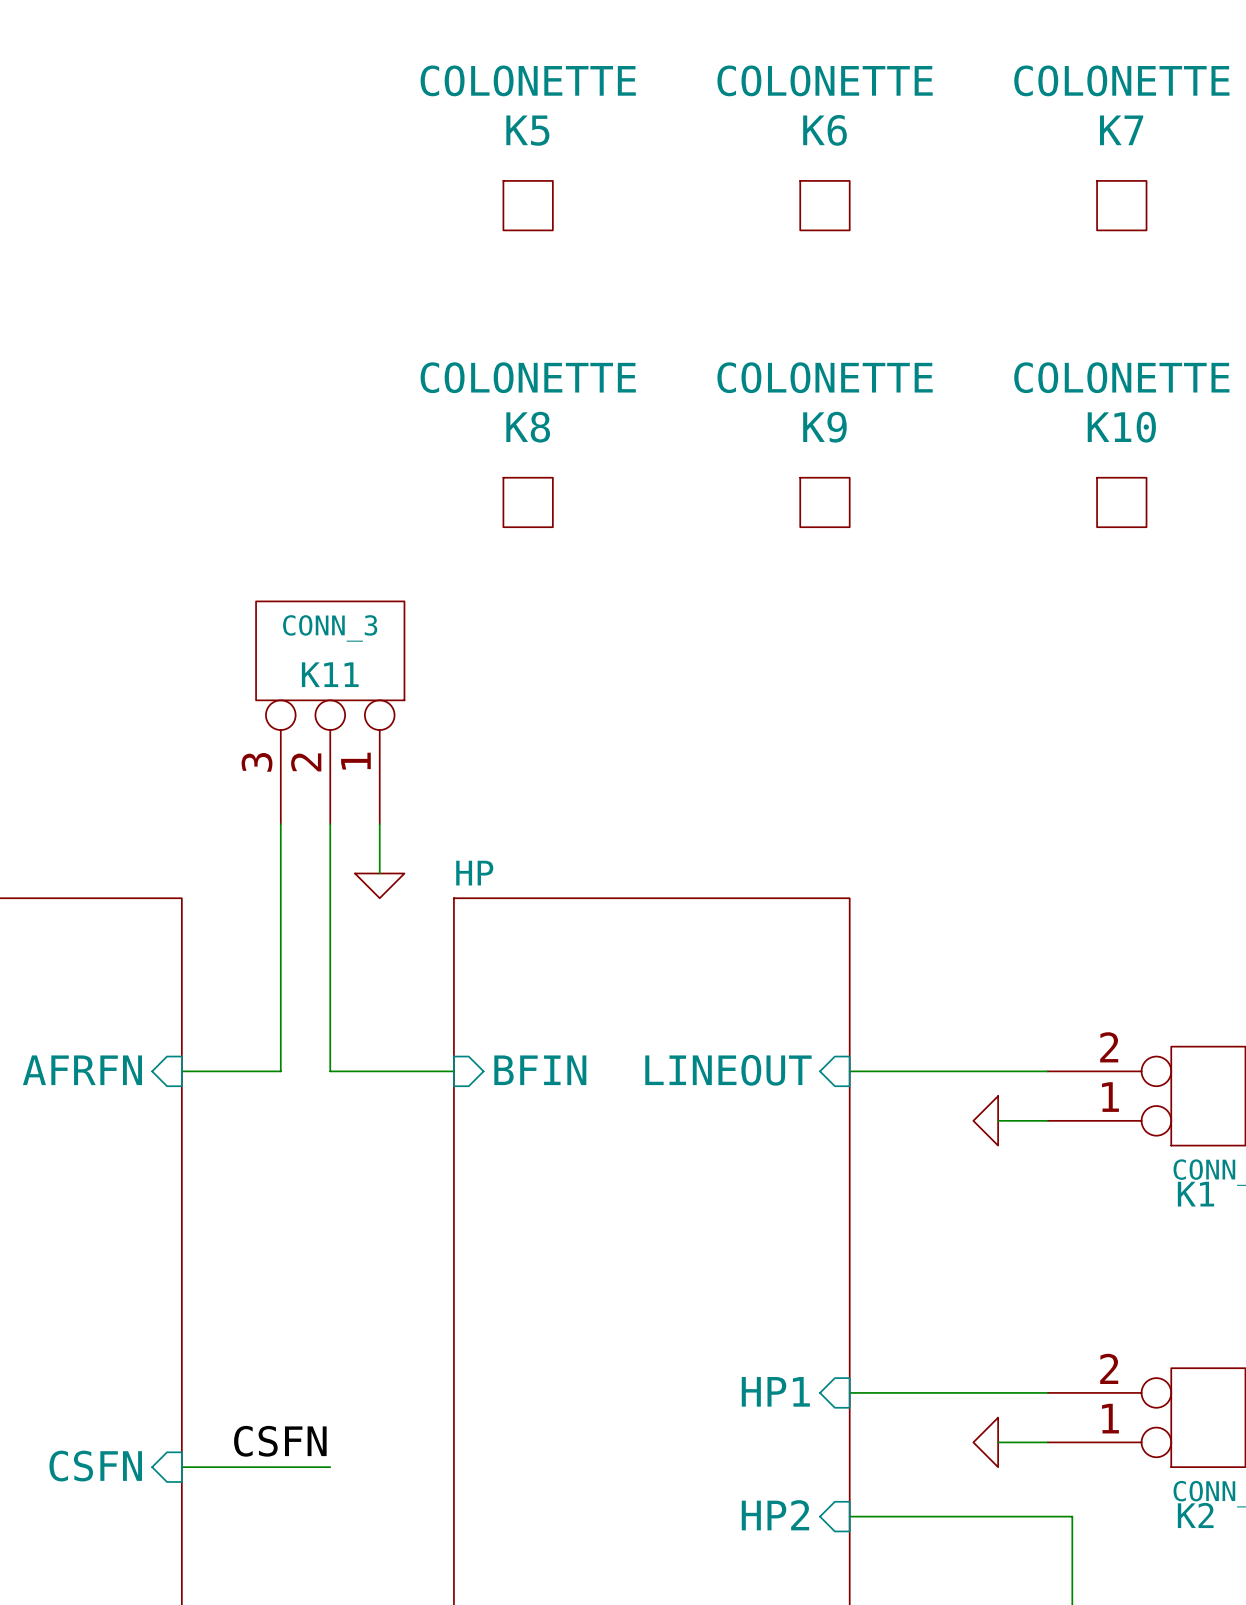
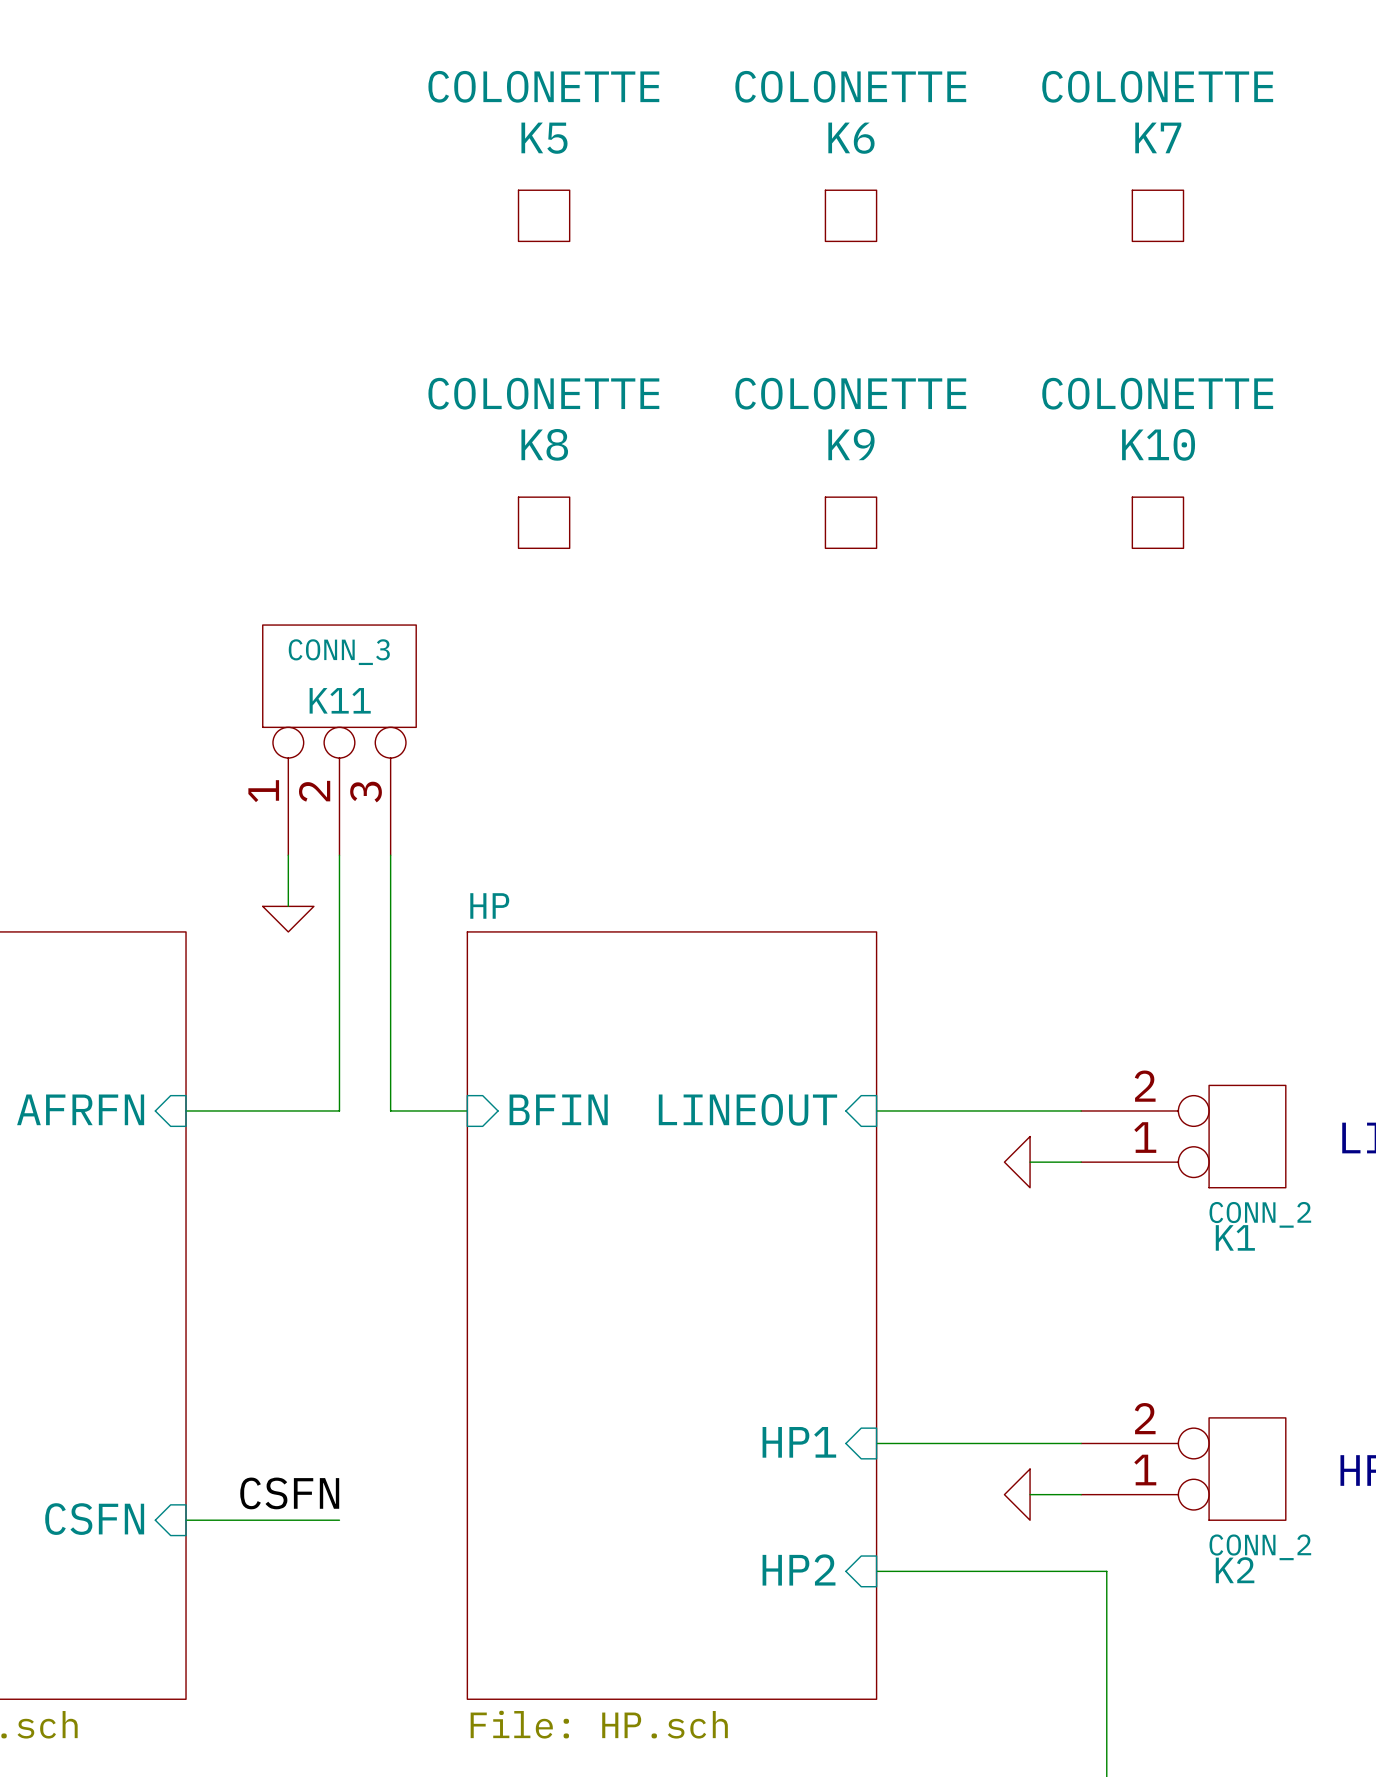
K11 flip: as is (330, 650) -> left-right (339, 676)
wire: (280, 873) (280, 1071) -> (390, 906) (390, 1110)
power symbol position: (379, 885) -> (288, 919)
wire: (330, 1071) (379, 1071) -> (339, 1110) (288, 1110)

